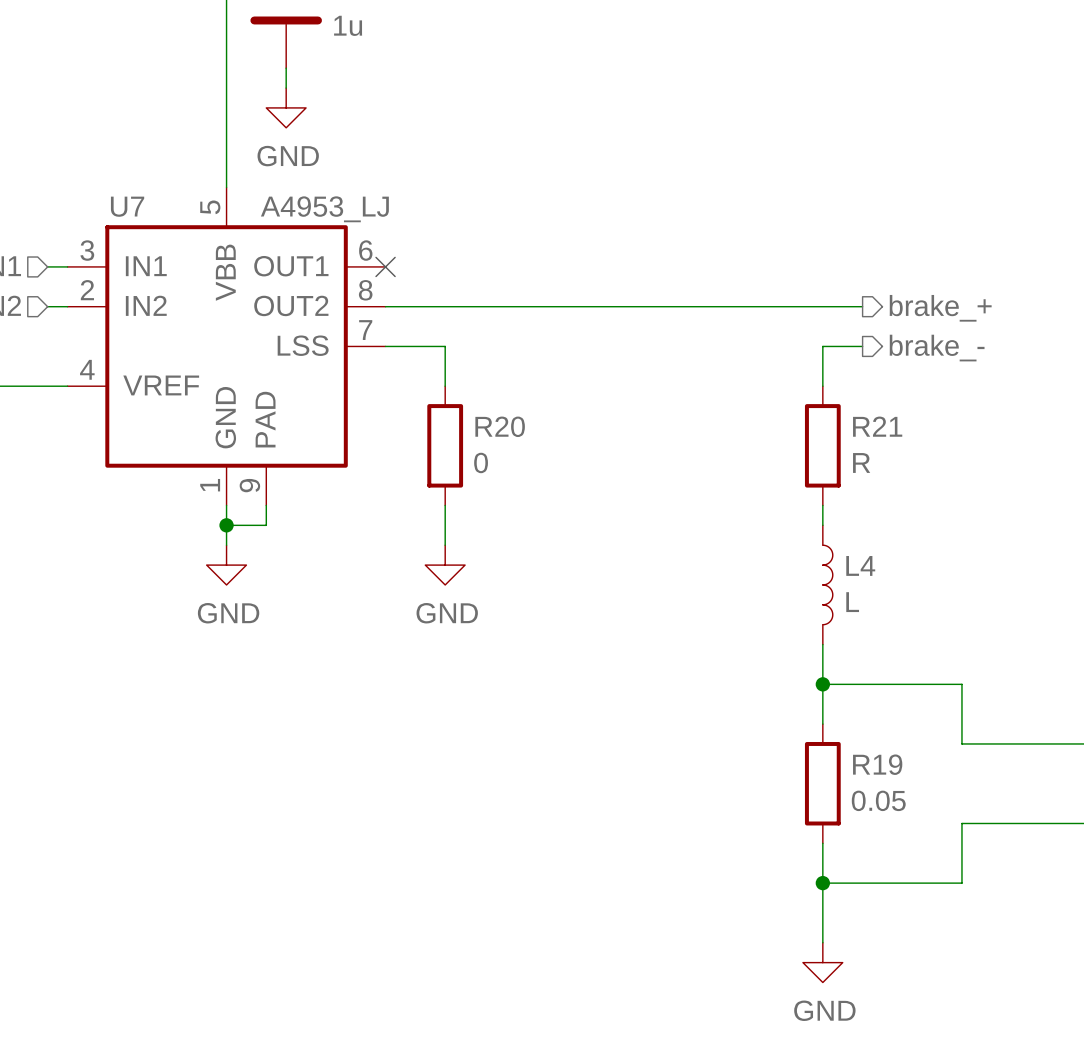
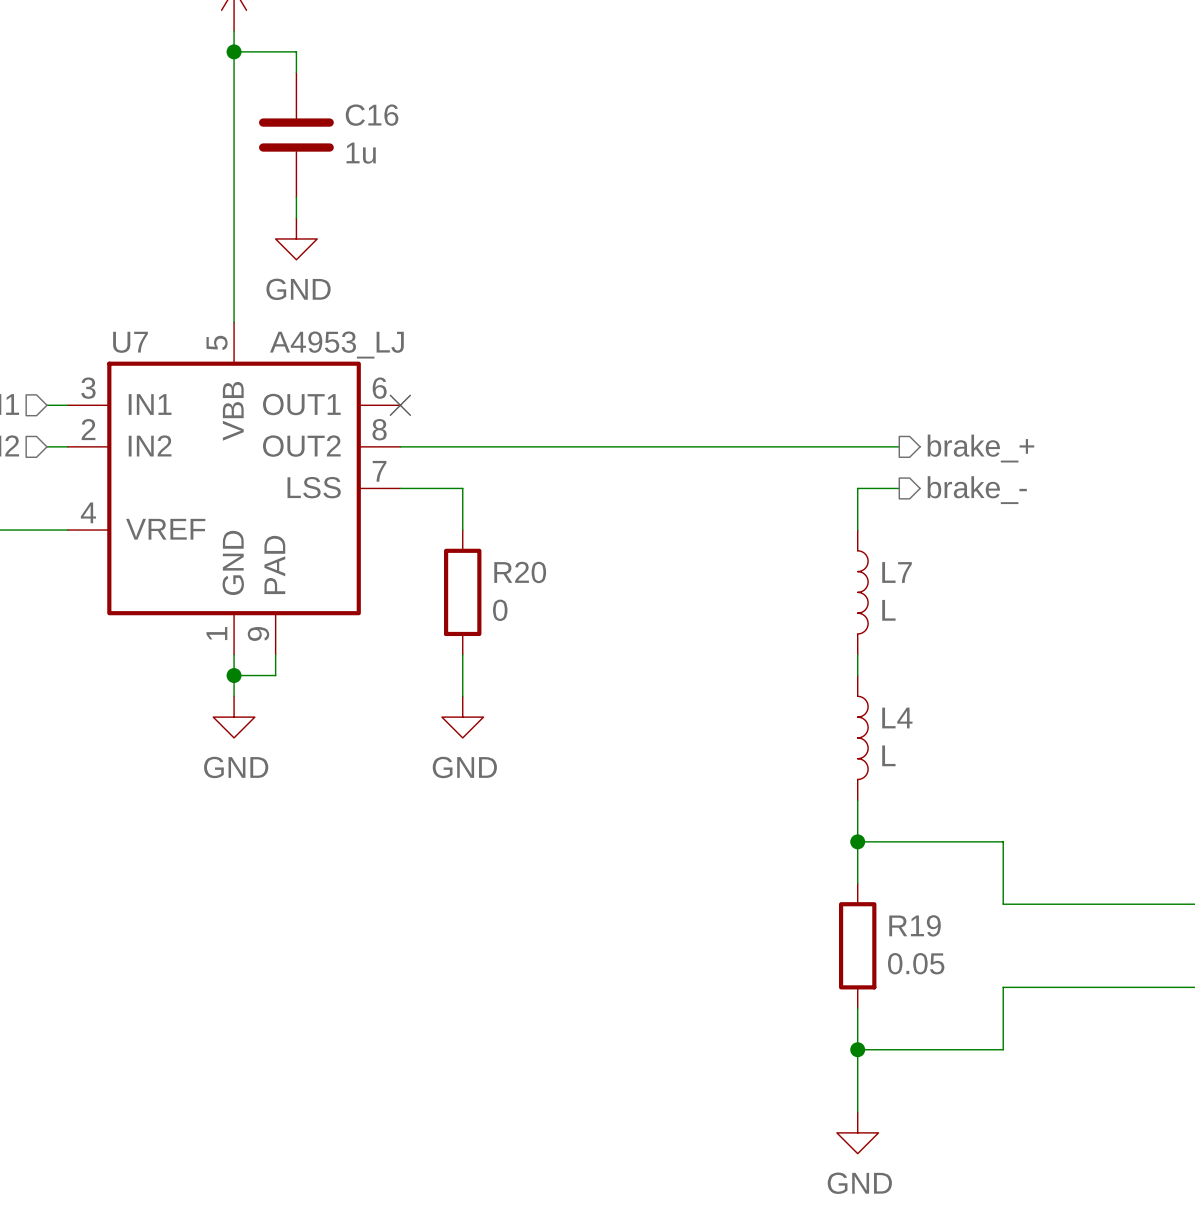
R21: R (822, 445) -> none
L7: none -> L (862, 592)

